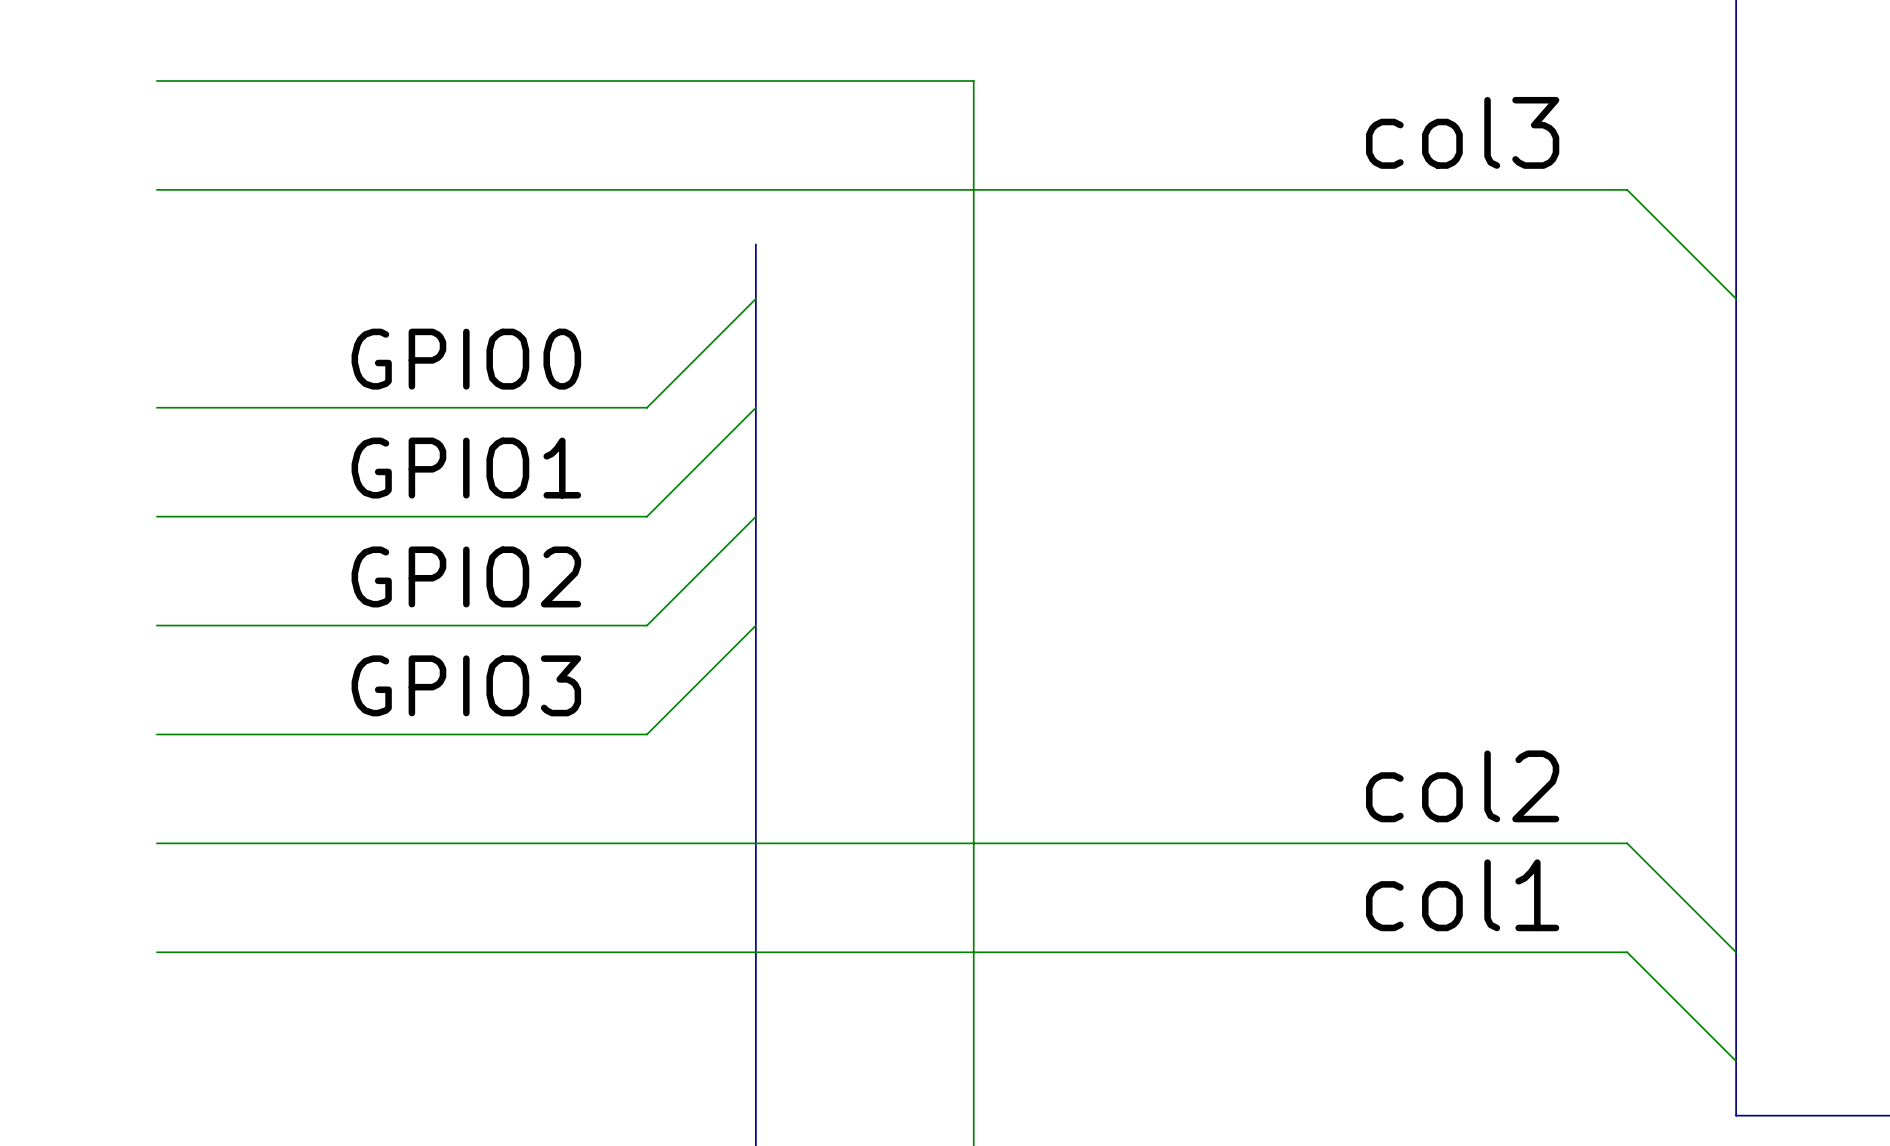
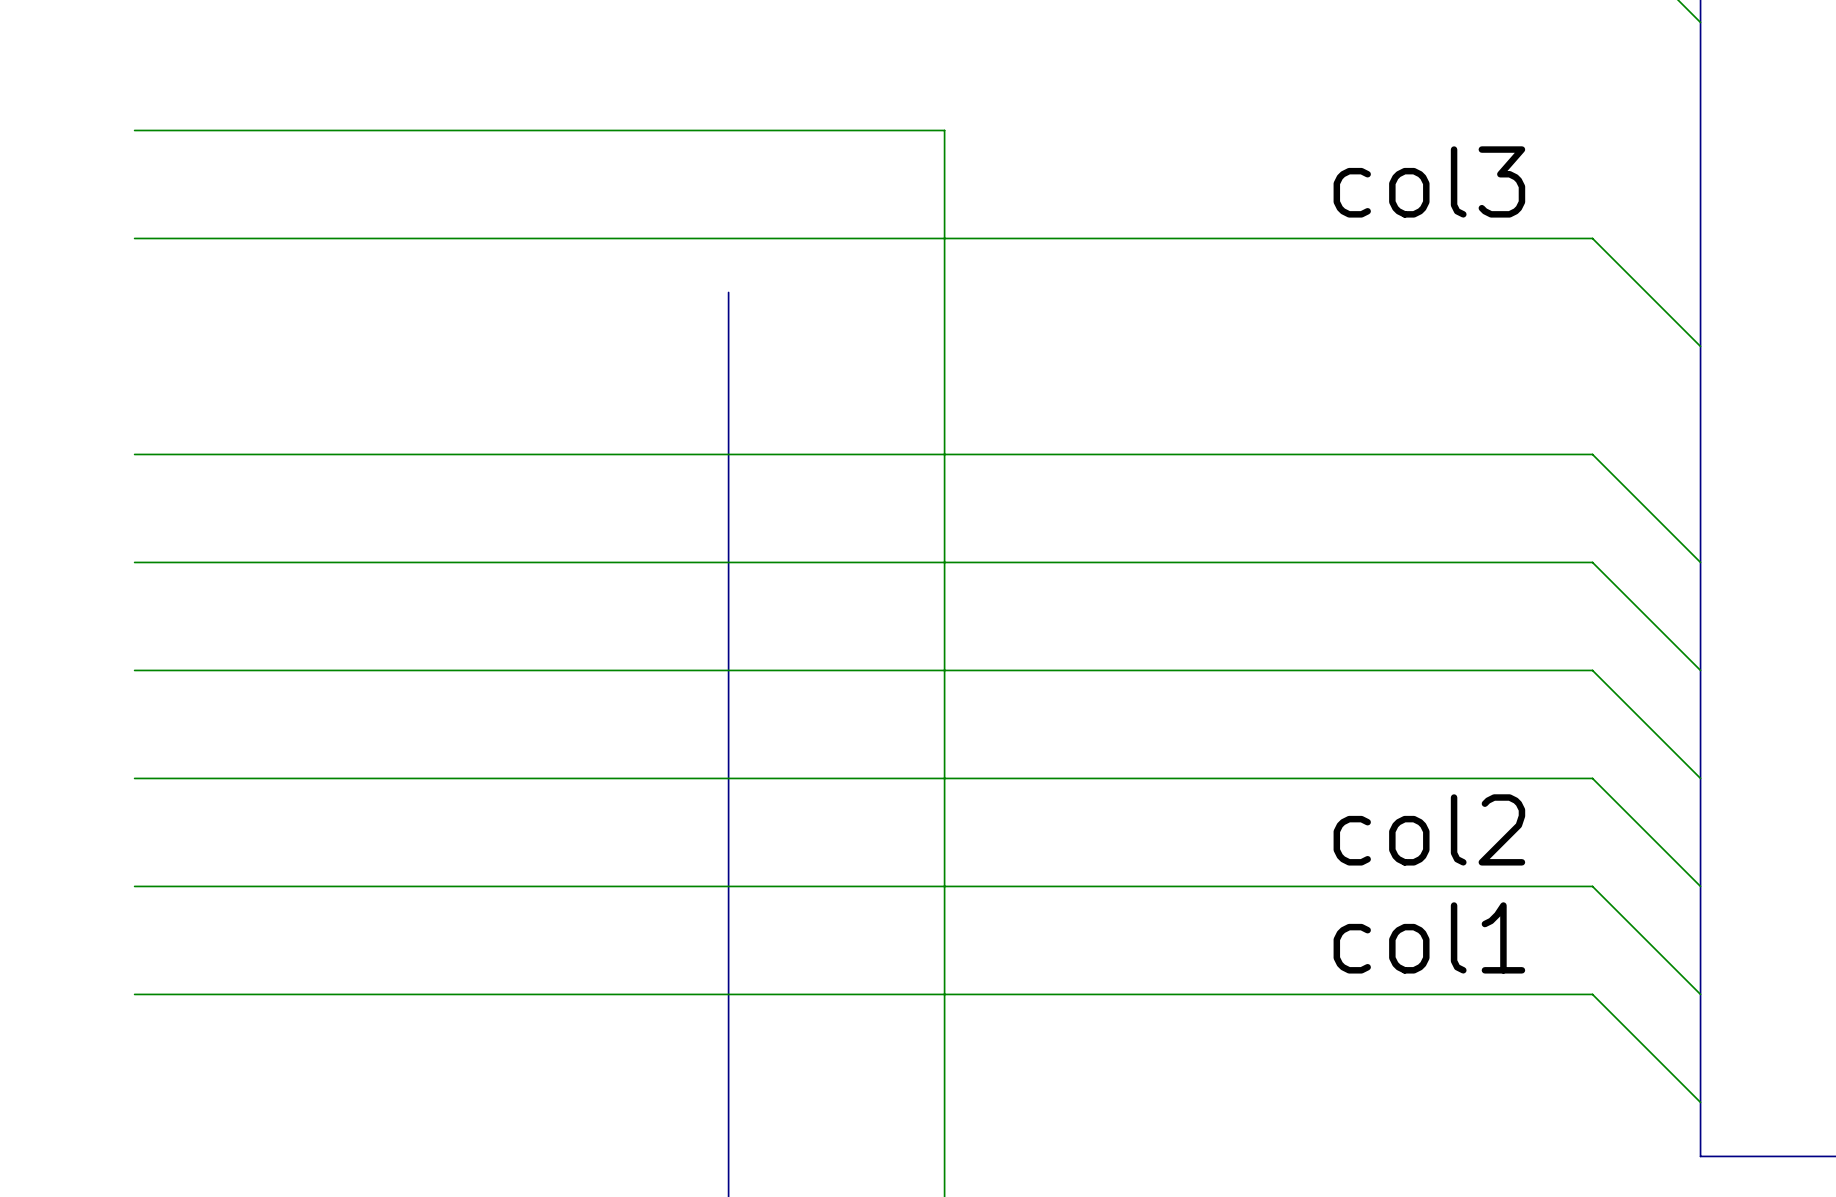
wire: (755, 298) (646, 407) -> (1700, 562) (1592, 454) (620, 454)
label: GPIO0 (466, 359) -> none
wire: (755, 407) (646, 516) -> (1700, 670) (1592, 562) (620, 562)
label: GPIO1 (466, 468) -> none
wire: (755, 516) (646, 625) -> (1700, 778) (1592, 670) (620, 670)
label: GPIO2 (466, 576) -> none
wire: (755, 625) (646, 734) -> (1700, 886) (1592, 778) (620, 778)
label: GPIO3 (466, 685) -> none

